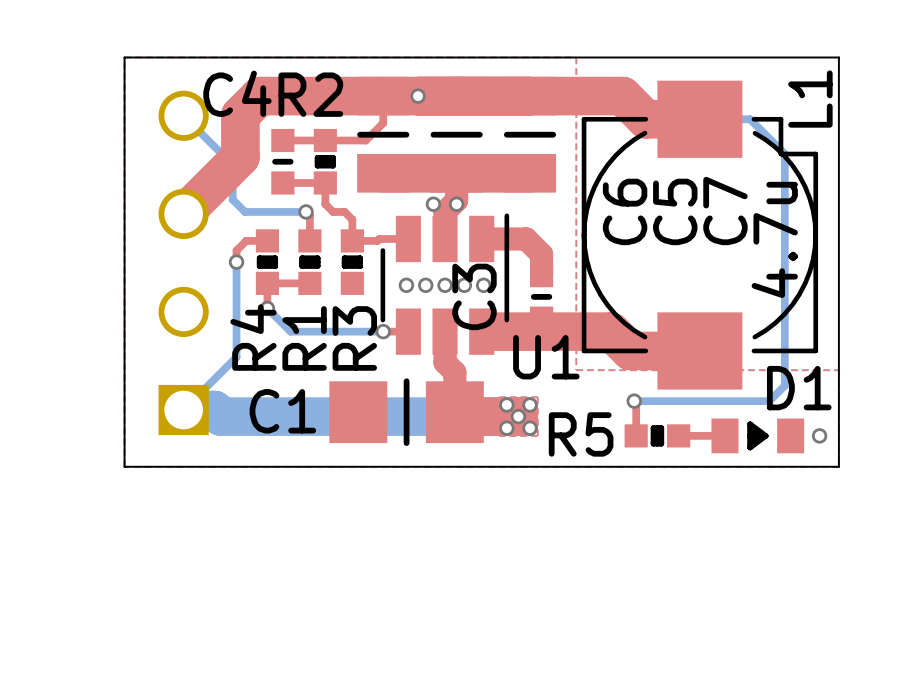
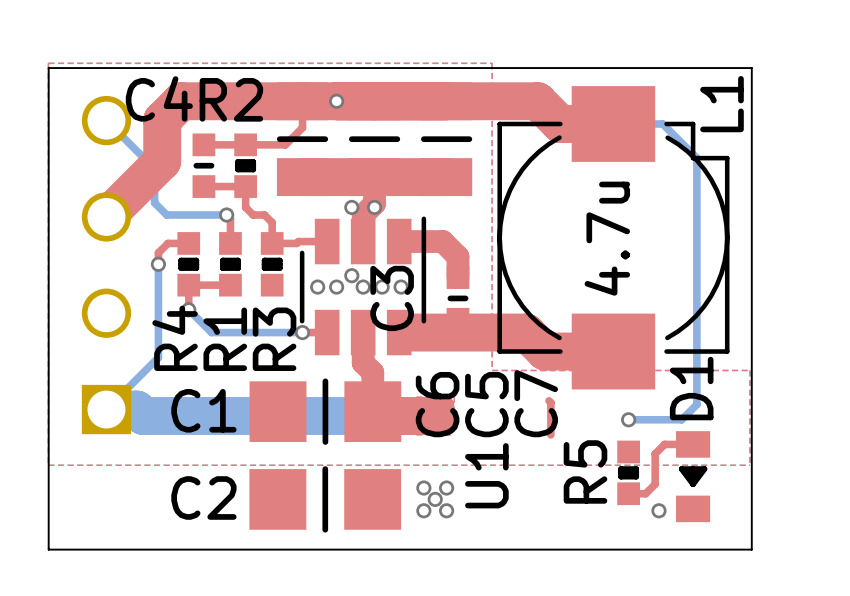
board edge: (124, 57) (124, 466) (838, 466) (838, 57) (124, 57) -> (48, 68) (48, 549) (751, 549) (751, 68) (48, 68)
C6 name position: C6 (625, 211) -> C6 (437, 404)
C5 name position: C5 (675, 211) -> C5 (486, 404)
C7 name position: C7 (725, 211) -> C7 (536, 403)
L1 value position: 4.7u (774, 239) -> 4.7u (607, 238)
via: none -> (351, 275)
via: none -> (317, 287)
via: (406, 285) -> none
via: none -> (336, 287)
via: (425, 285) -> none
U1 name rotation: 0° (546, 357) -> 90° counterclockwise (486, 475)
U1 name position: U1 (546, 357) -> U1 (486, 475)
bottom track: (784, 385) (769, 401) (634, 401) -> (696, 385) (696, 404) (681, 419) (628, 419)
via: (634, 401) -> none
via: (506, 405) -> none
via: (529, 405) -> none
via: (518, 416) -> none
via: none -> (628, 419)
via: (506, 428) -> none
via: (529, 428) -> none
R5 rotation: 0° (657, 435) -> 90° clockwise (628, 472)
R5 position: (657, 435) -> (628, 472)
top track: (678, 435) (724, 435) -> none
D1 rotation: 0° (757, 435) -> 90° clockwise (693, 476)
via: (819, 435) -> none
top track: none -> (693, 444) (664, 444) (655, 453) (655, 484) (645, 493) (628, 493)
via: none -> (423, 488)
via: none -> (446, 488)
C2: none -> (325, 499)
via: none -> (435, 499)
via: none -> (423, 510)
via: none -> (446, 510)
via: none -> (658, 510)

